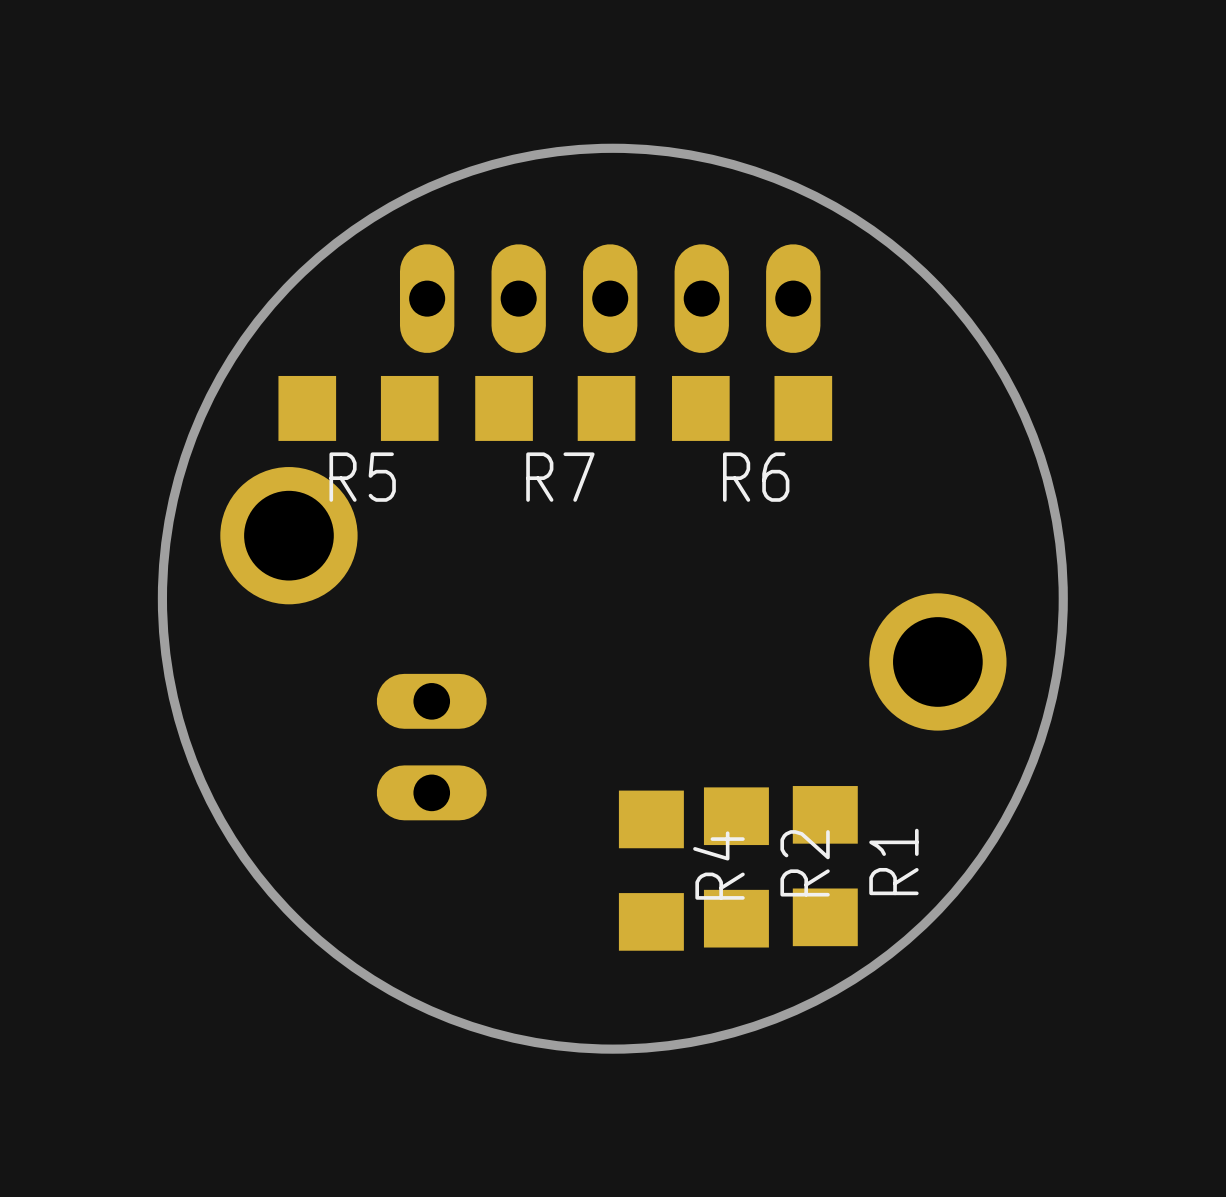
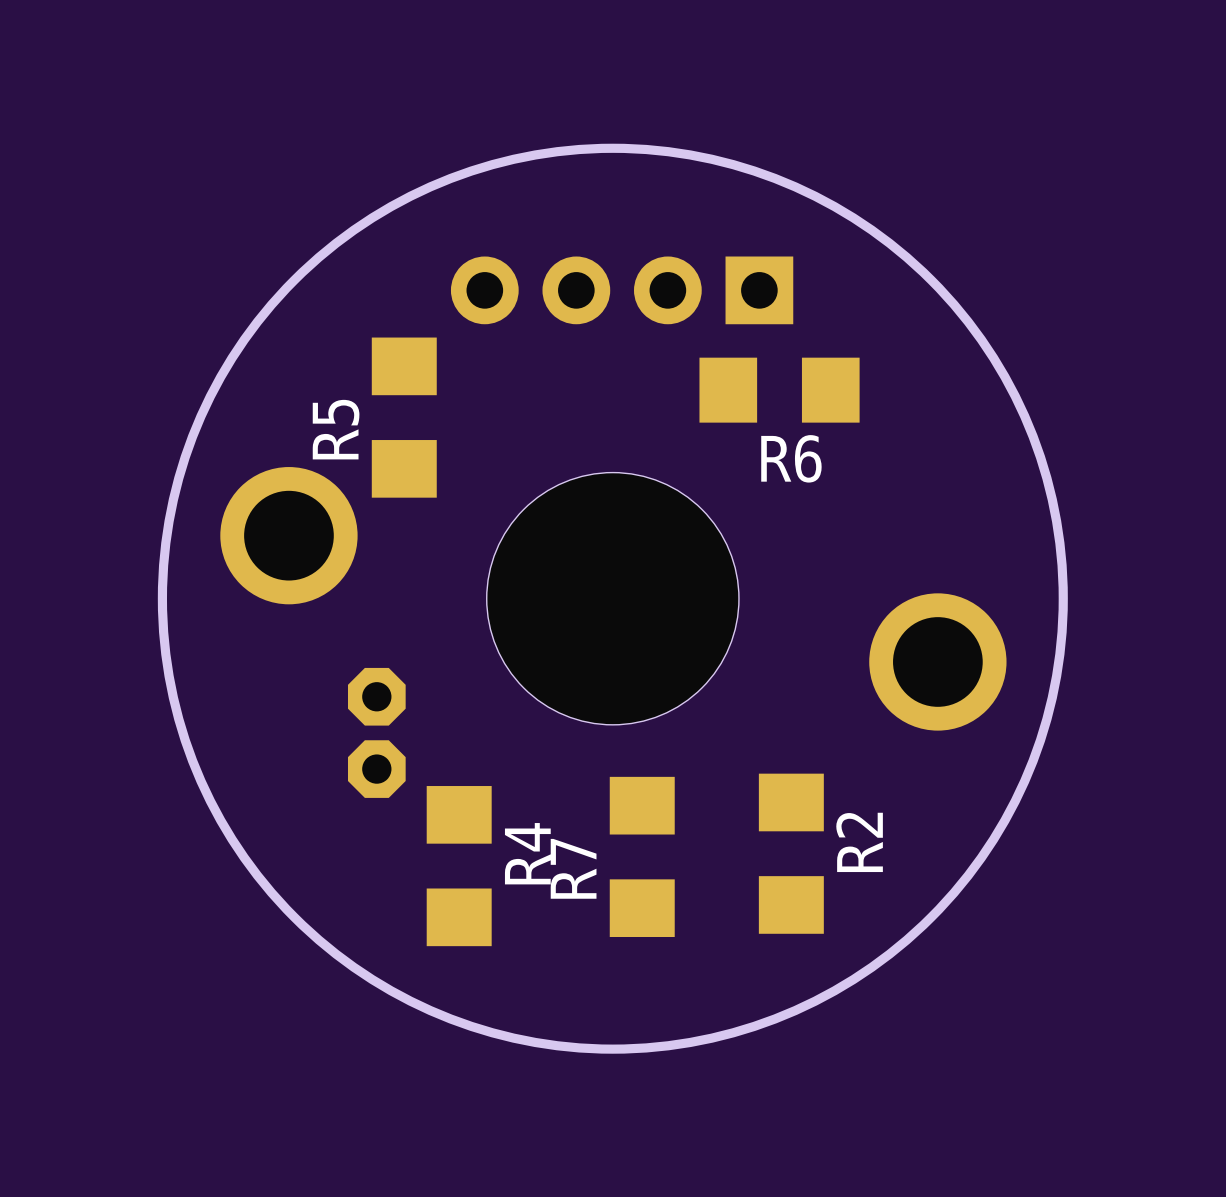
part footprint: [399, 244, 821, 353] -> [450, 256, 794, 325]
R5 rotation: 0° (358, 408) -> 90° clockwise (404, 417)
R7 rotation: 0° (555, 408) -> 90° clockwise (642, 856)
R7 position: (555, 408) -> (642, 856)
R6 position: (752, 408) -> (779, 390)
hole: none -> (612, 598)
part: none -> (376, 696)
part: (431, 747) -> none
part: none -> (376, 769)
R1: (825, 866) -> none
R2 position: (736, 867) -> (791, 853)
R4 position: (651, 870) -> (459, 866)

